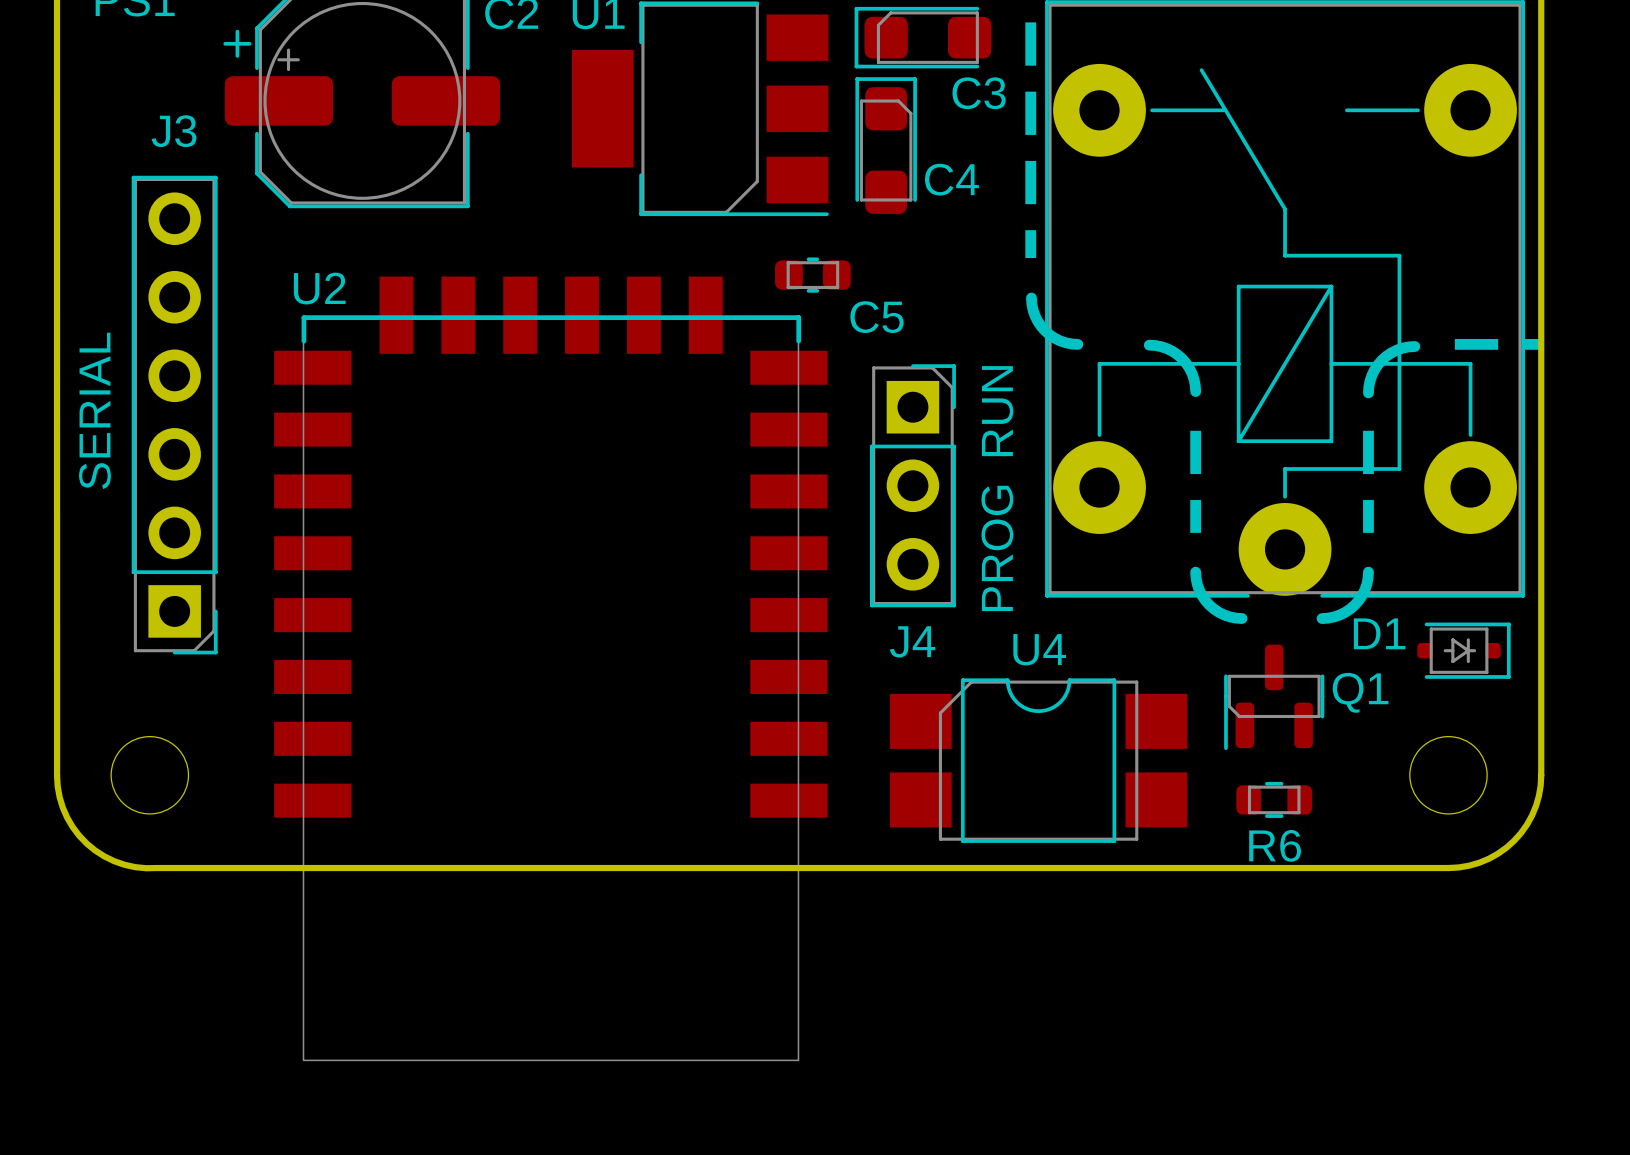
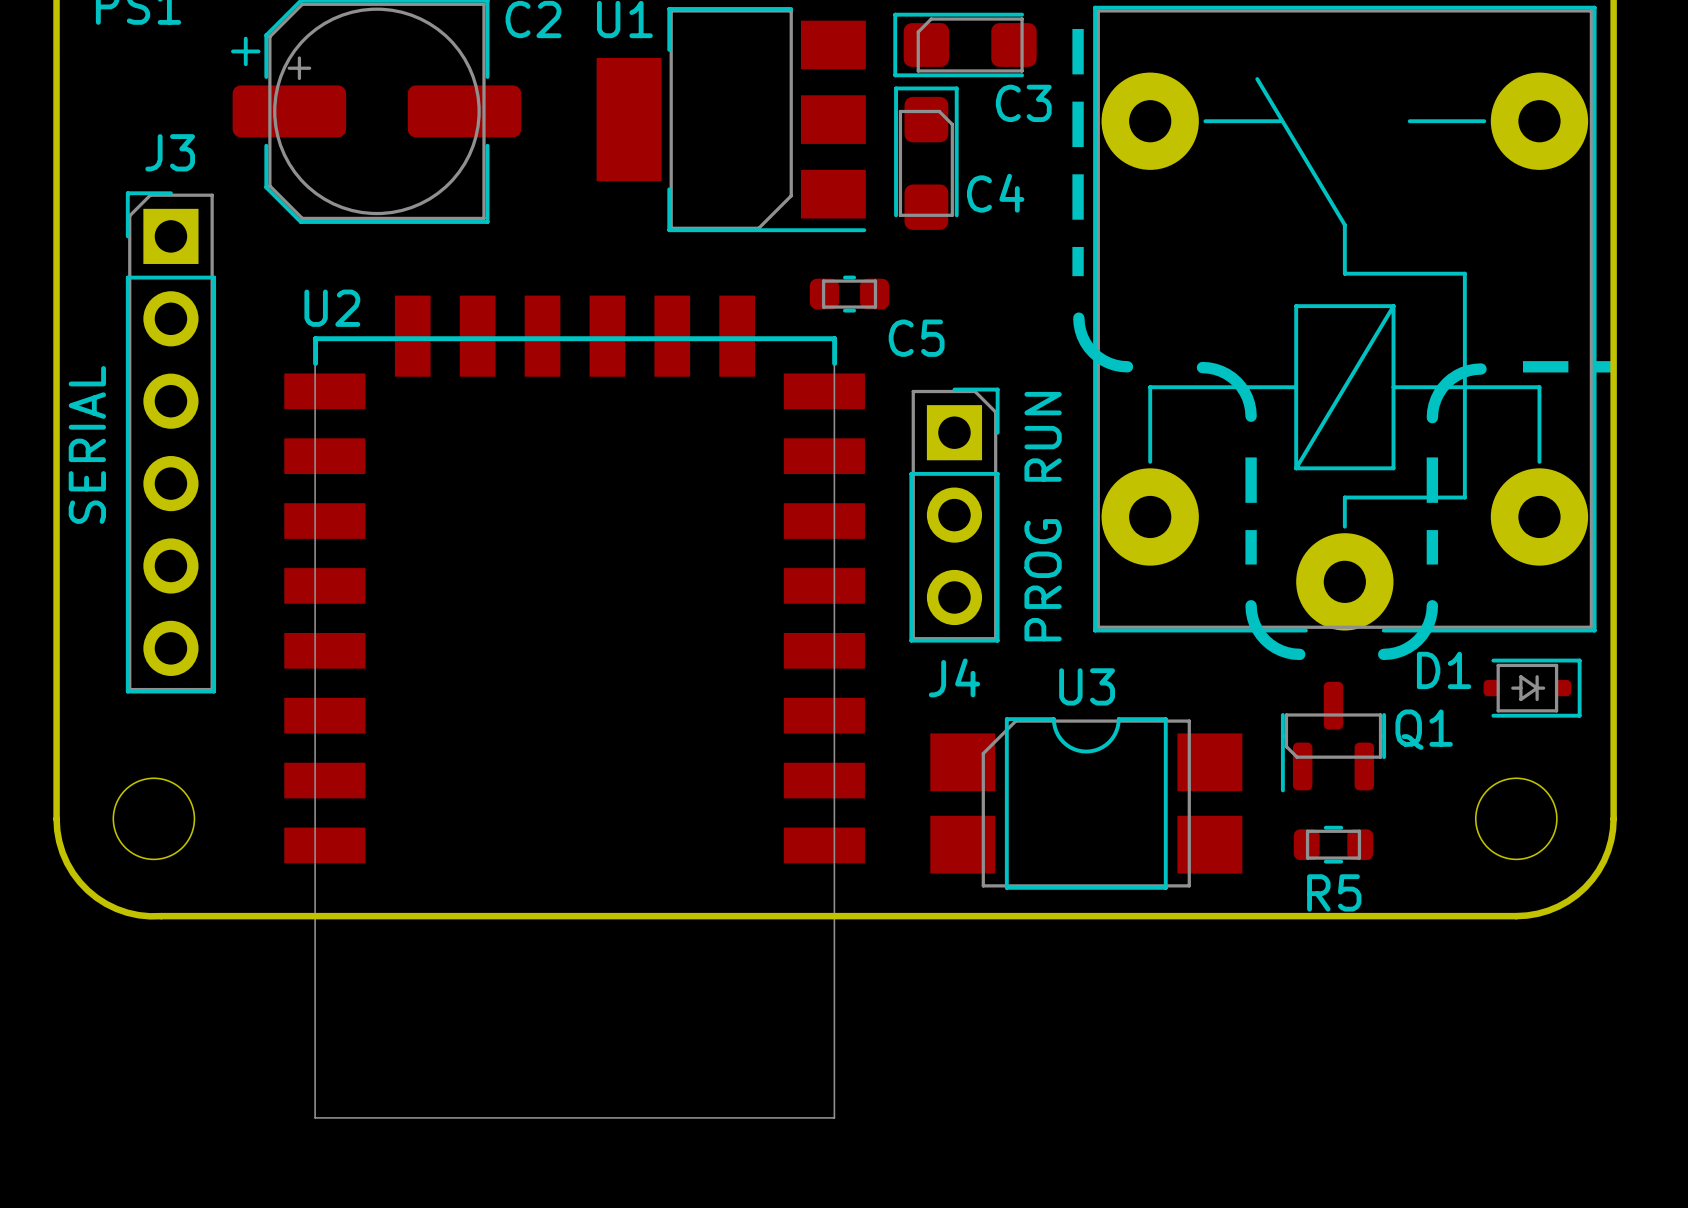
J3 footprint: [131, 175, 218, 655] -> [125, 191, 217, 694]
U4 name: U4 (1039, 649) -> U3 (1087, 686)
R6 name: R6 (1275, 845) -> R5 (1334, 892)

